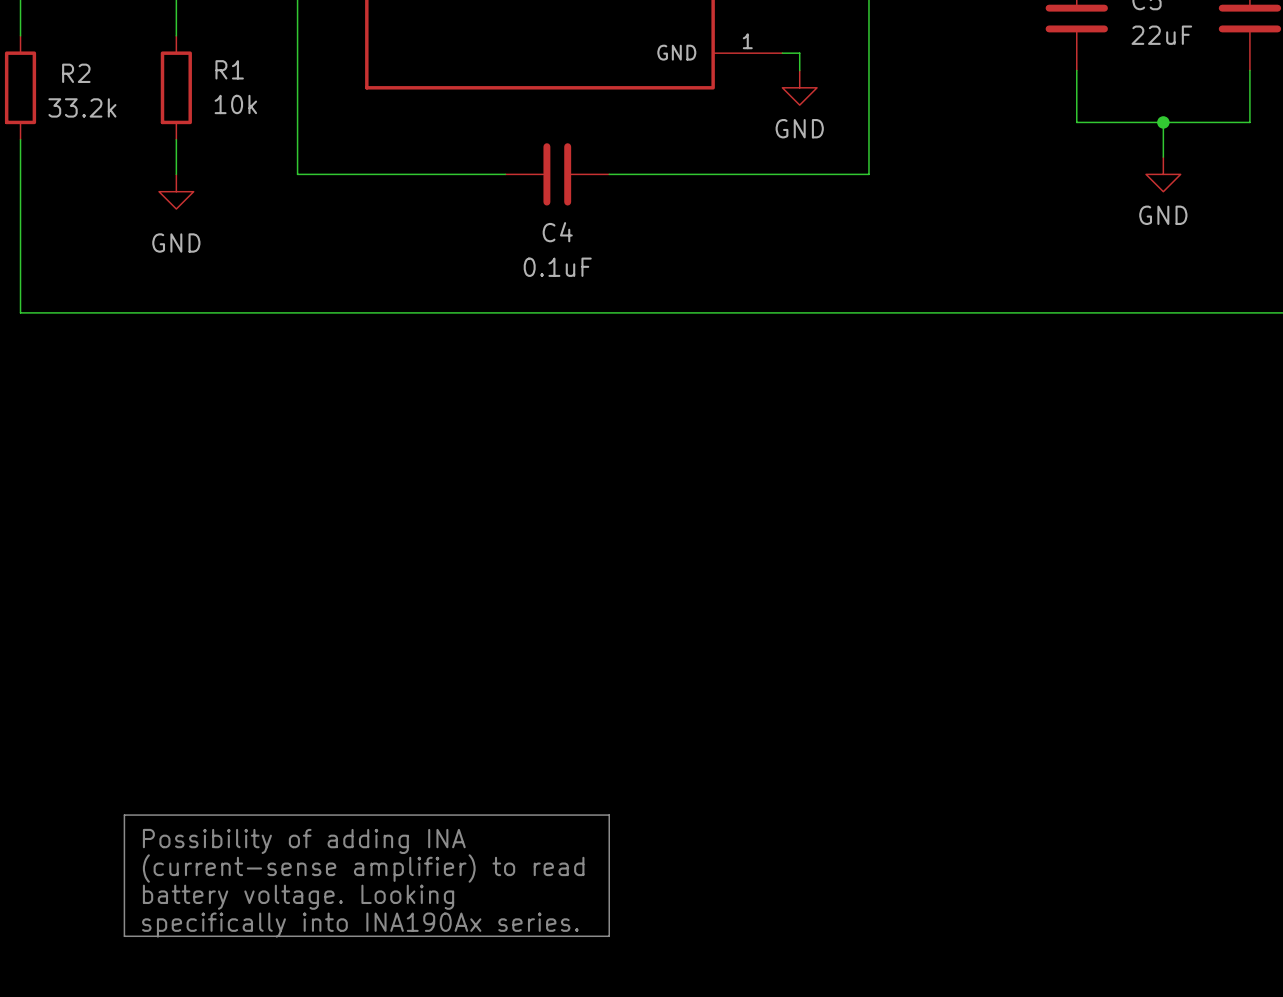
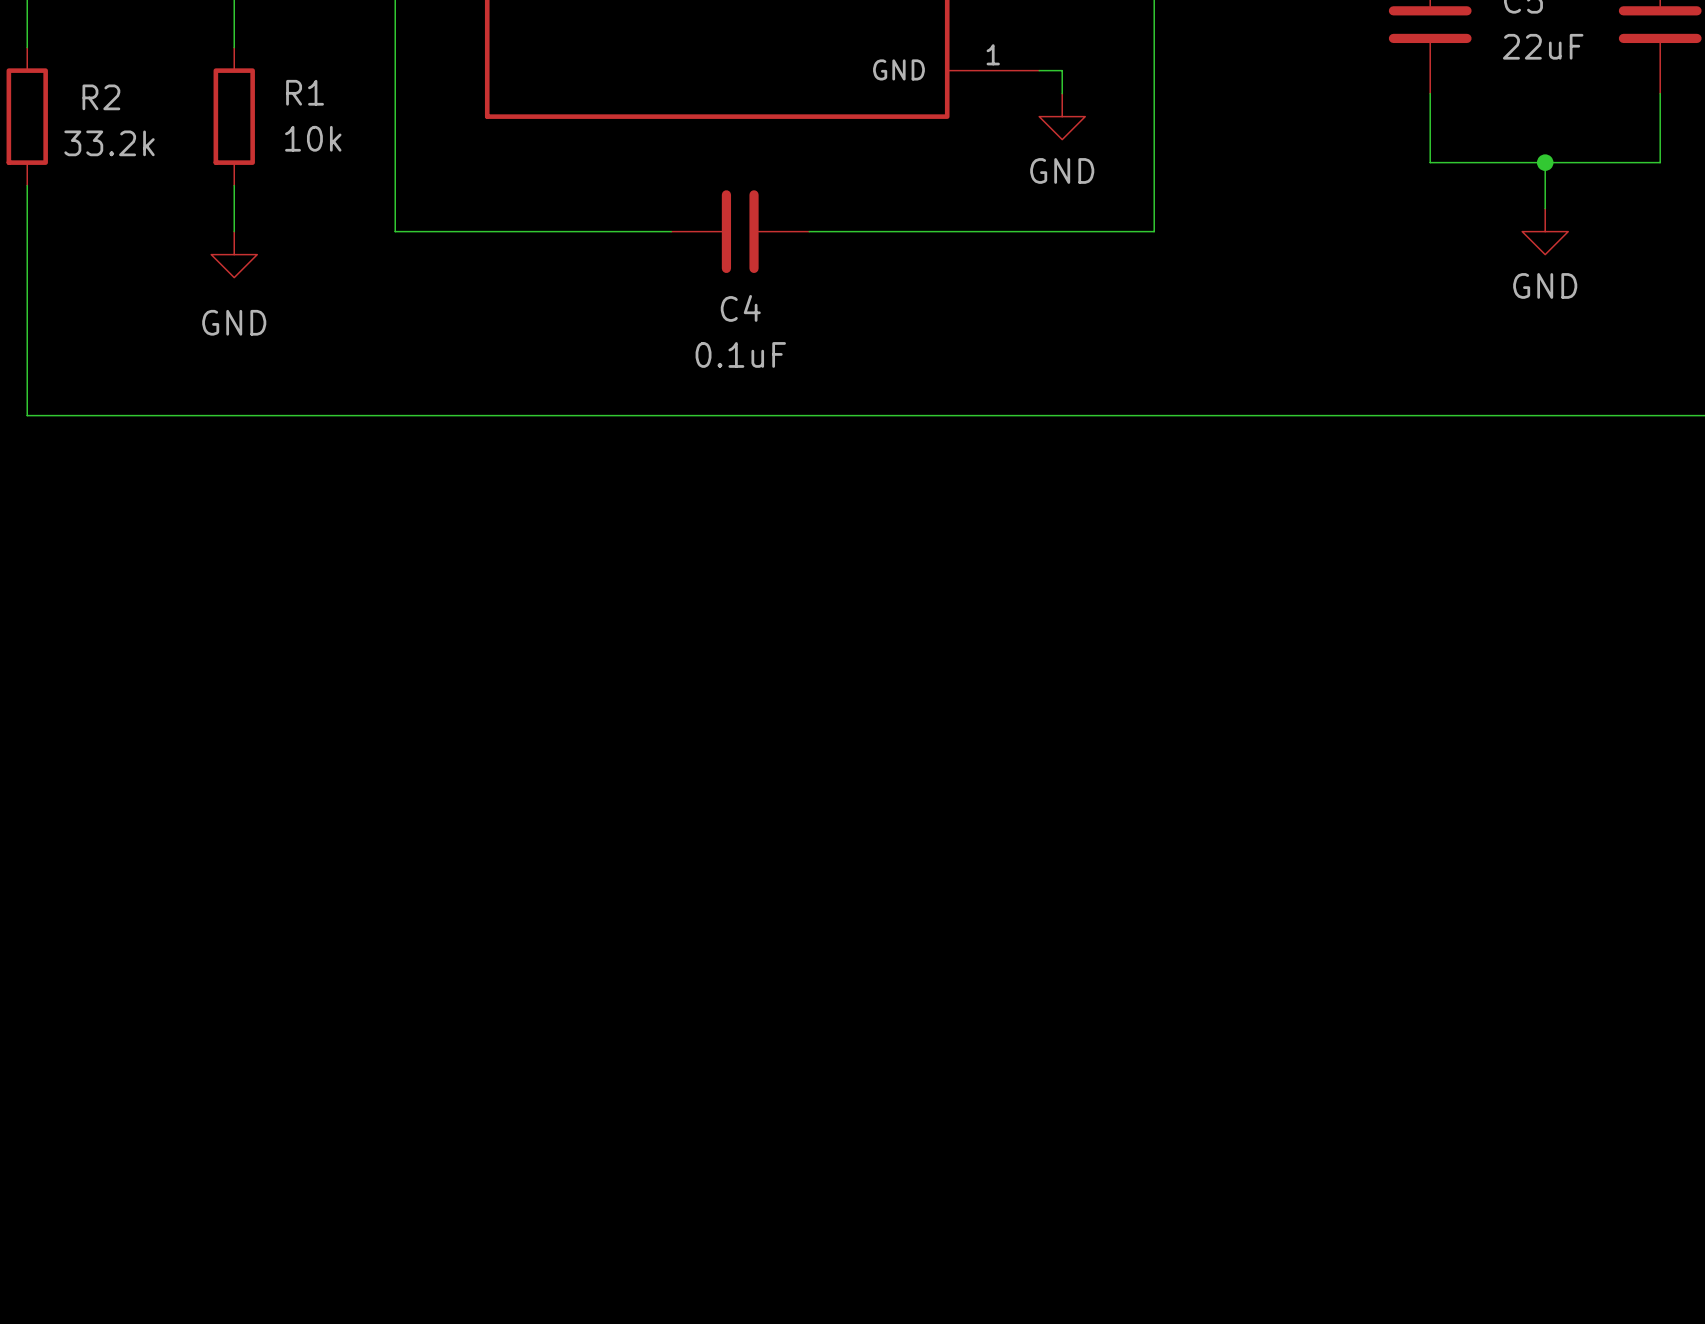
line: (124, 815) (609, 815) (609, 936) (124, 936) (124, 815) -> none
text: Possibility of adding INA (304, 841) -> none
text: (current-sense amplifier) to read (363, 868) -> none
text: battery voltage. Looking (298, 897) -> none
text: specifically into INA190Ax series. (360, 925) -> none

